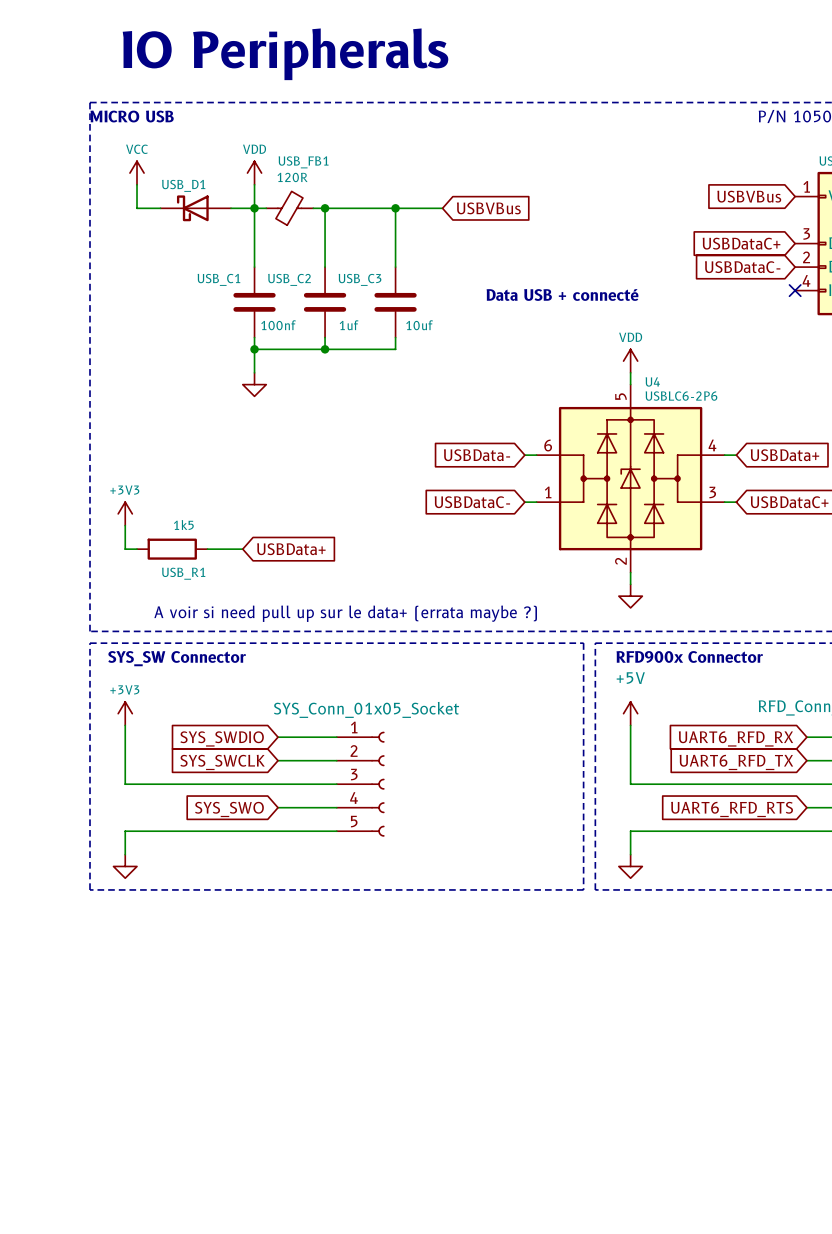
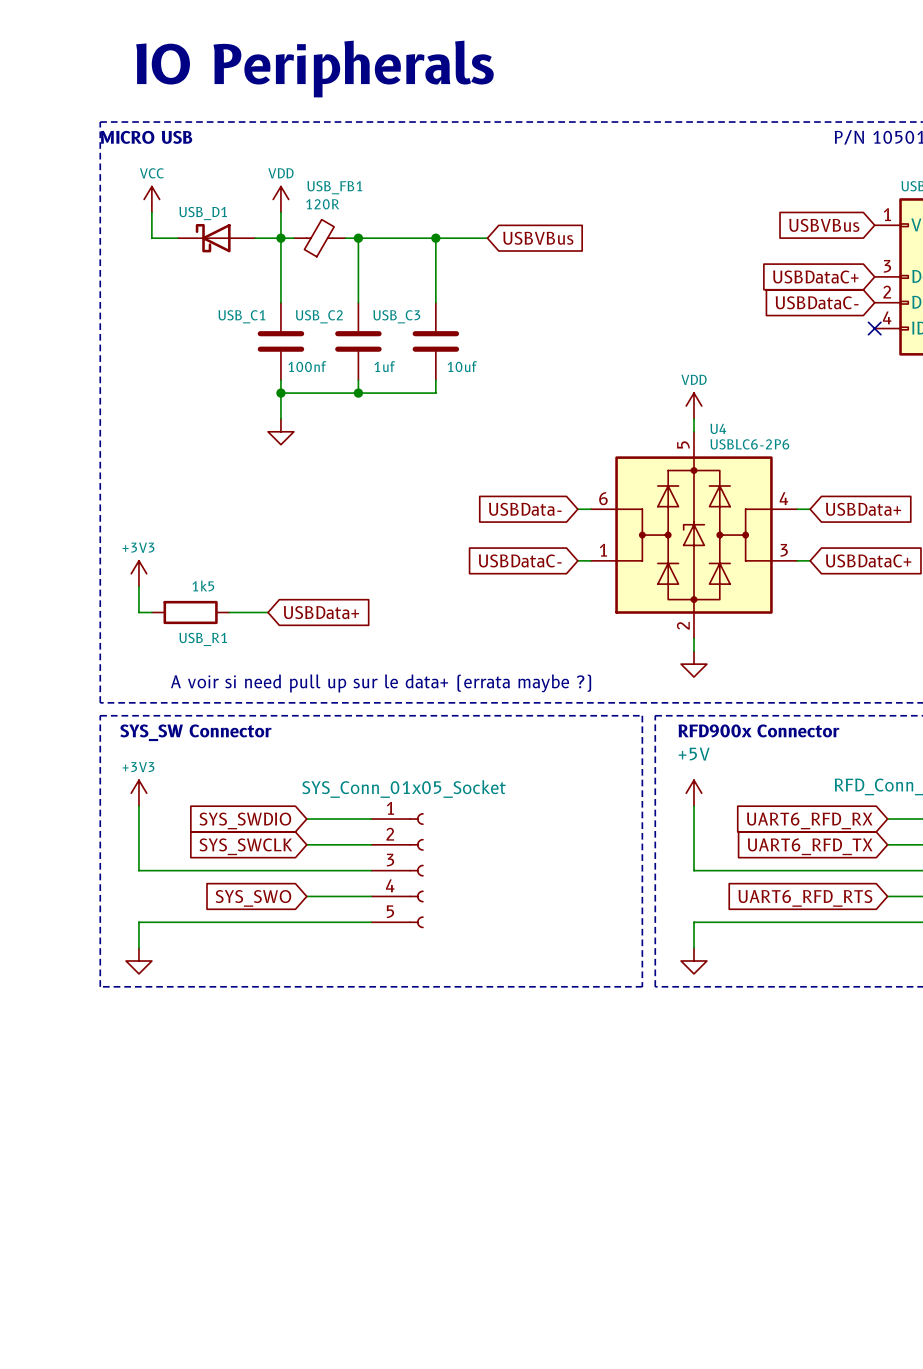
text: Data USB + connecté (562, 294) -> none

